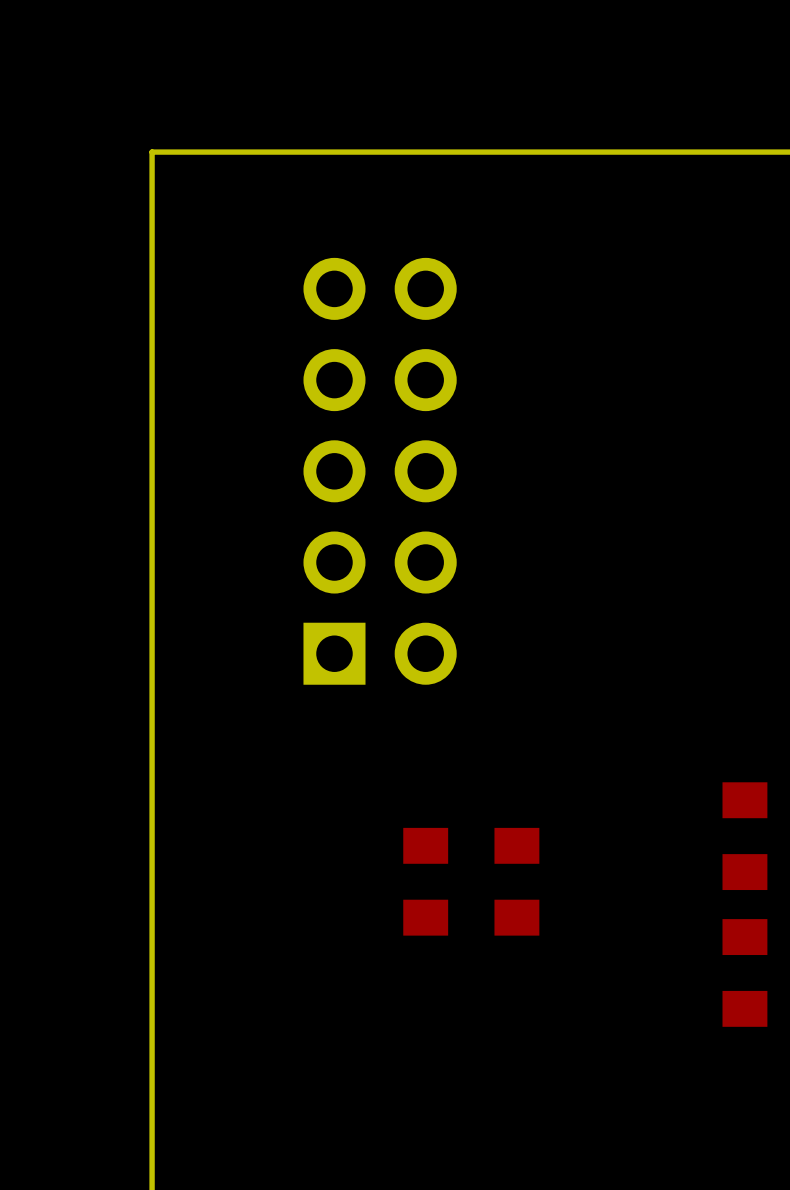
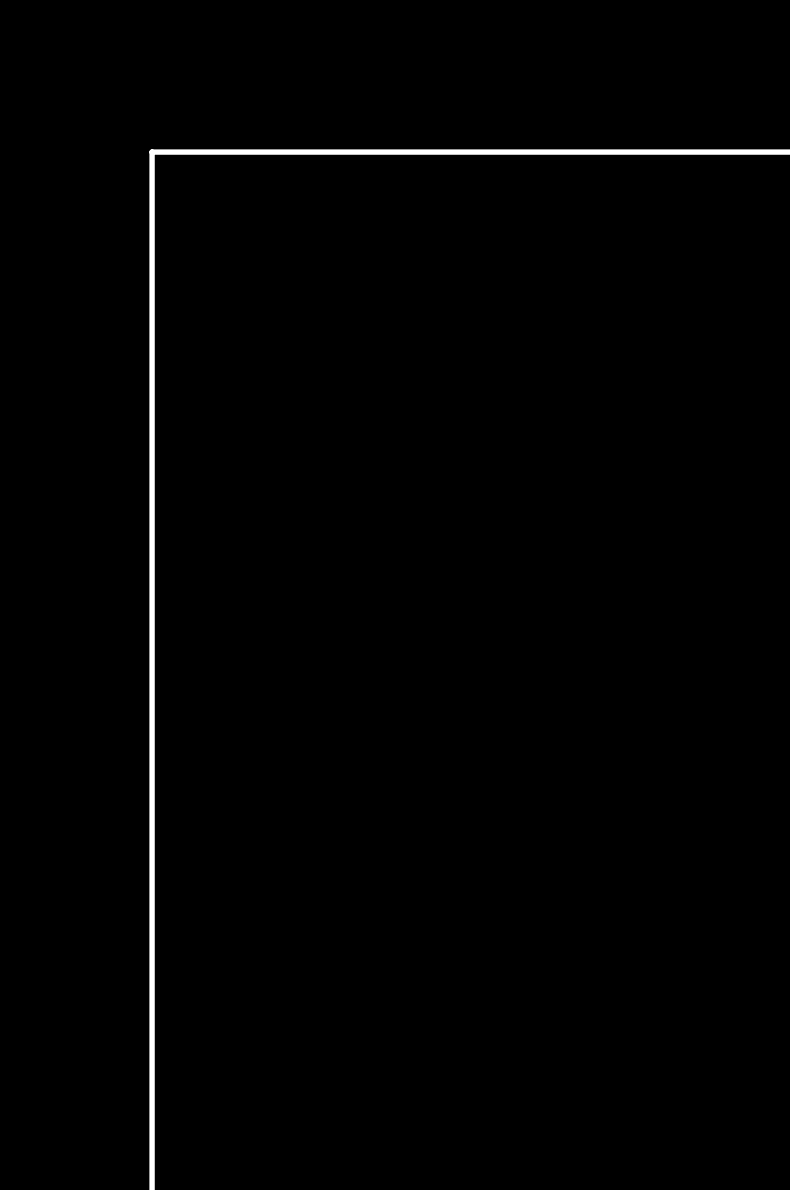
part: (380, 471) -> none
part: (744, 836) -> none
part: (425, 881) -> none
part: (516, 881) -> none
part: (744, 972) -> none

